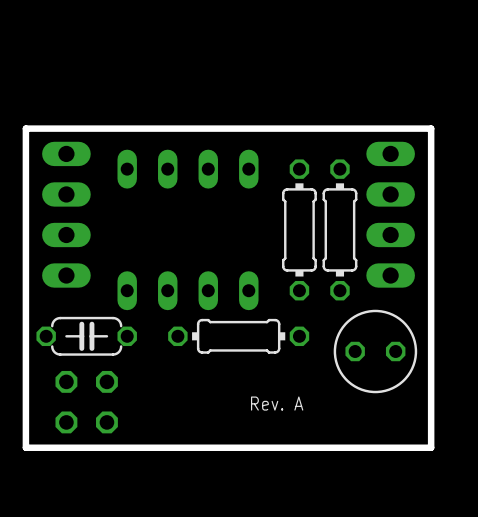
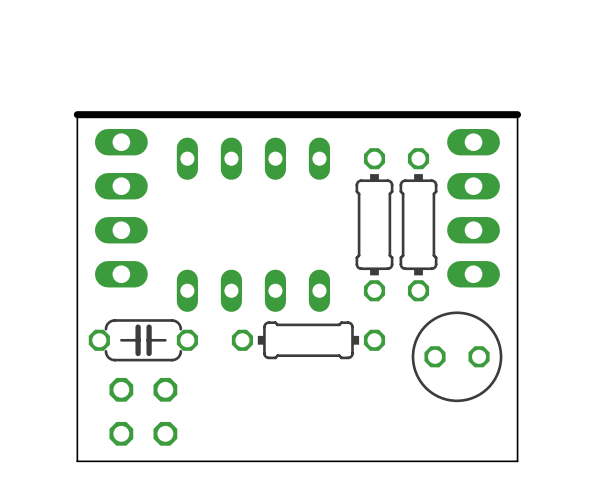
board edge width: thick (25, 128) (25, 447) (431, 447) (431, 128) -> thin (77, 114) (77, 461) (517, 461) (517, 114)
text: Rev. A (277, 403) -> none

